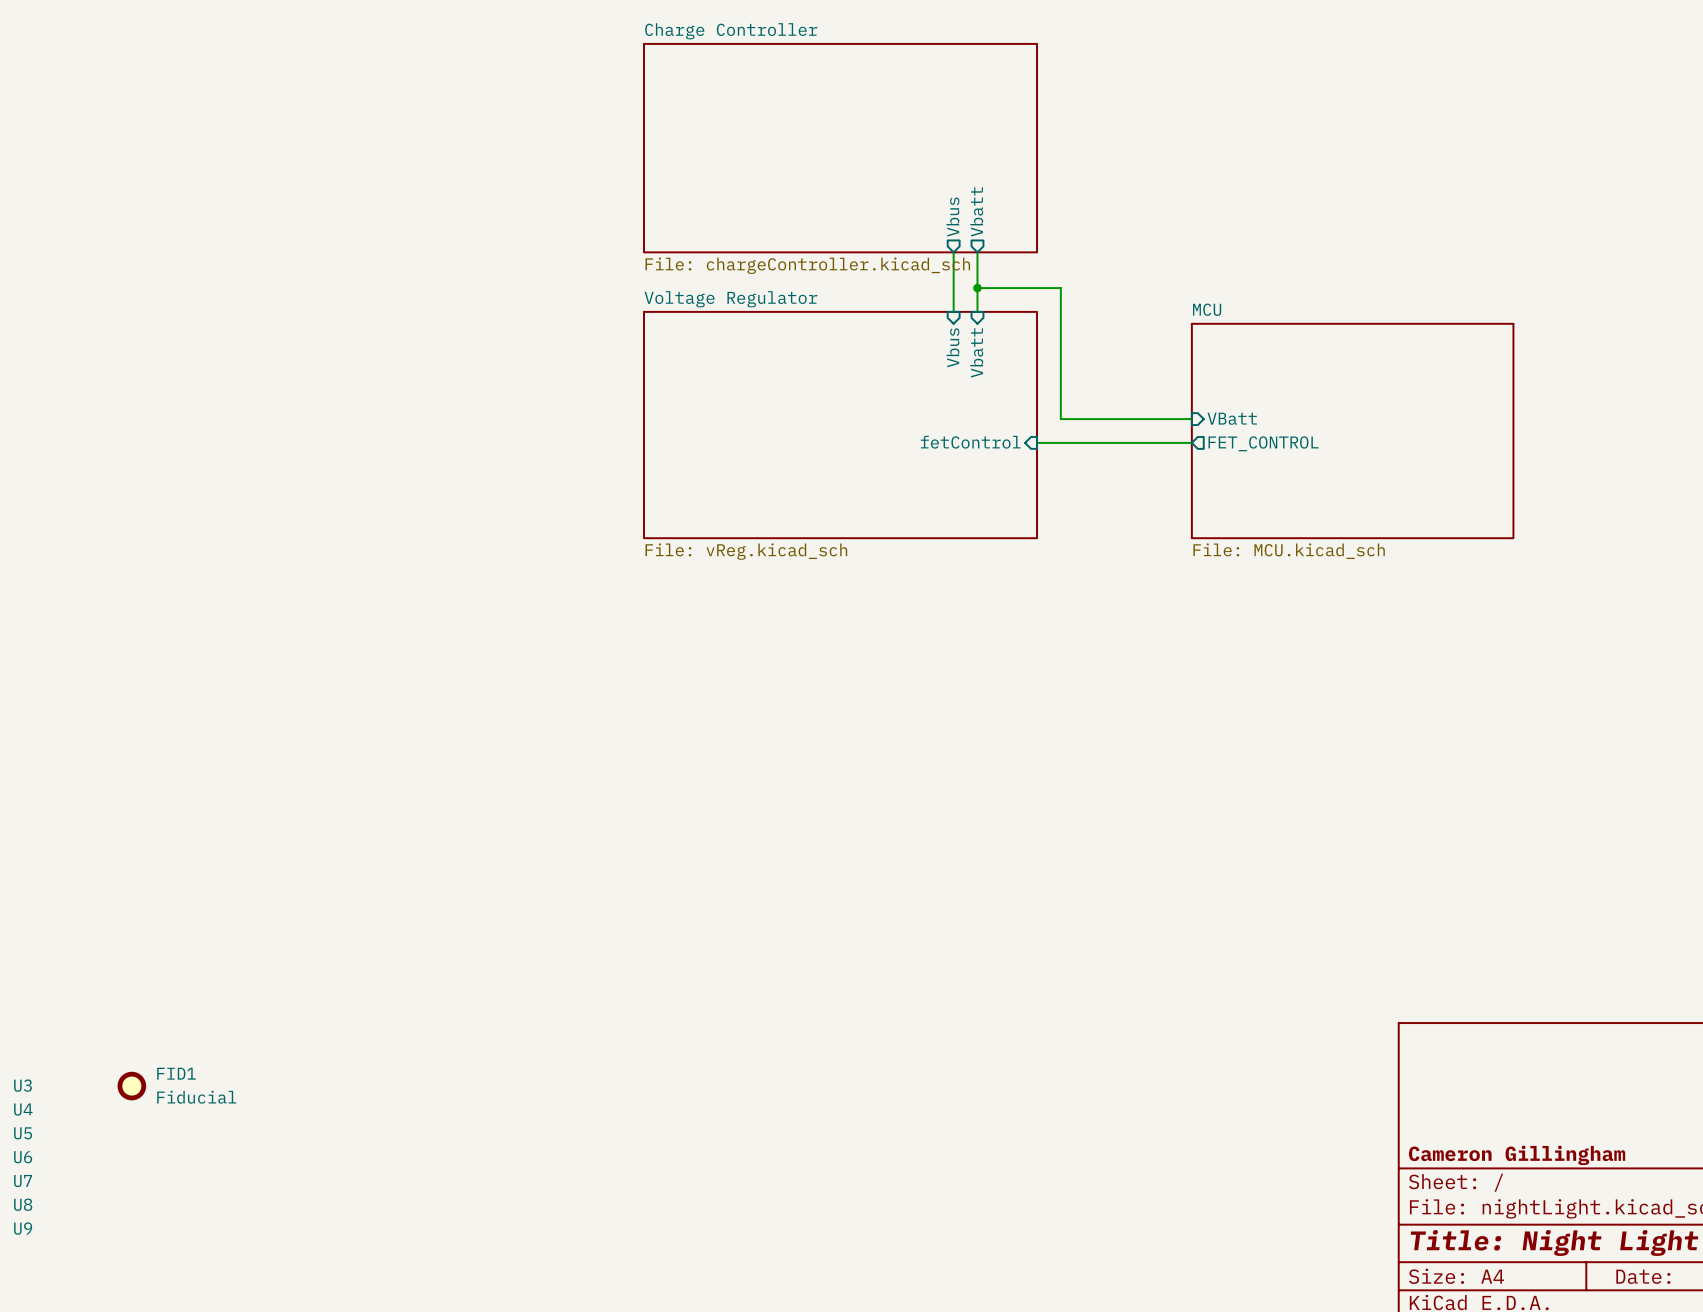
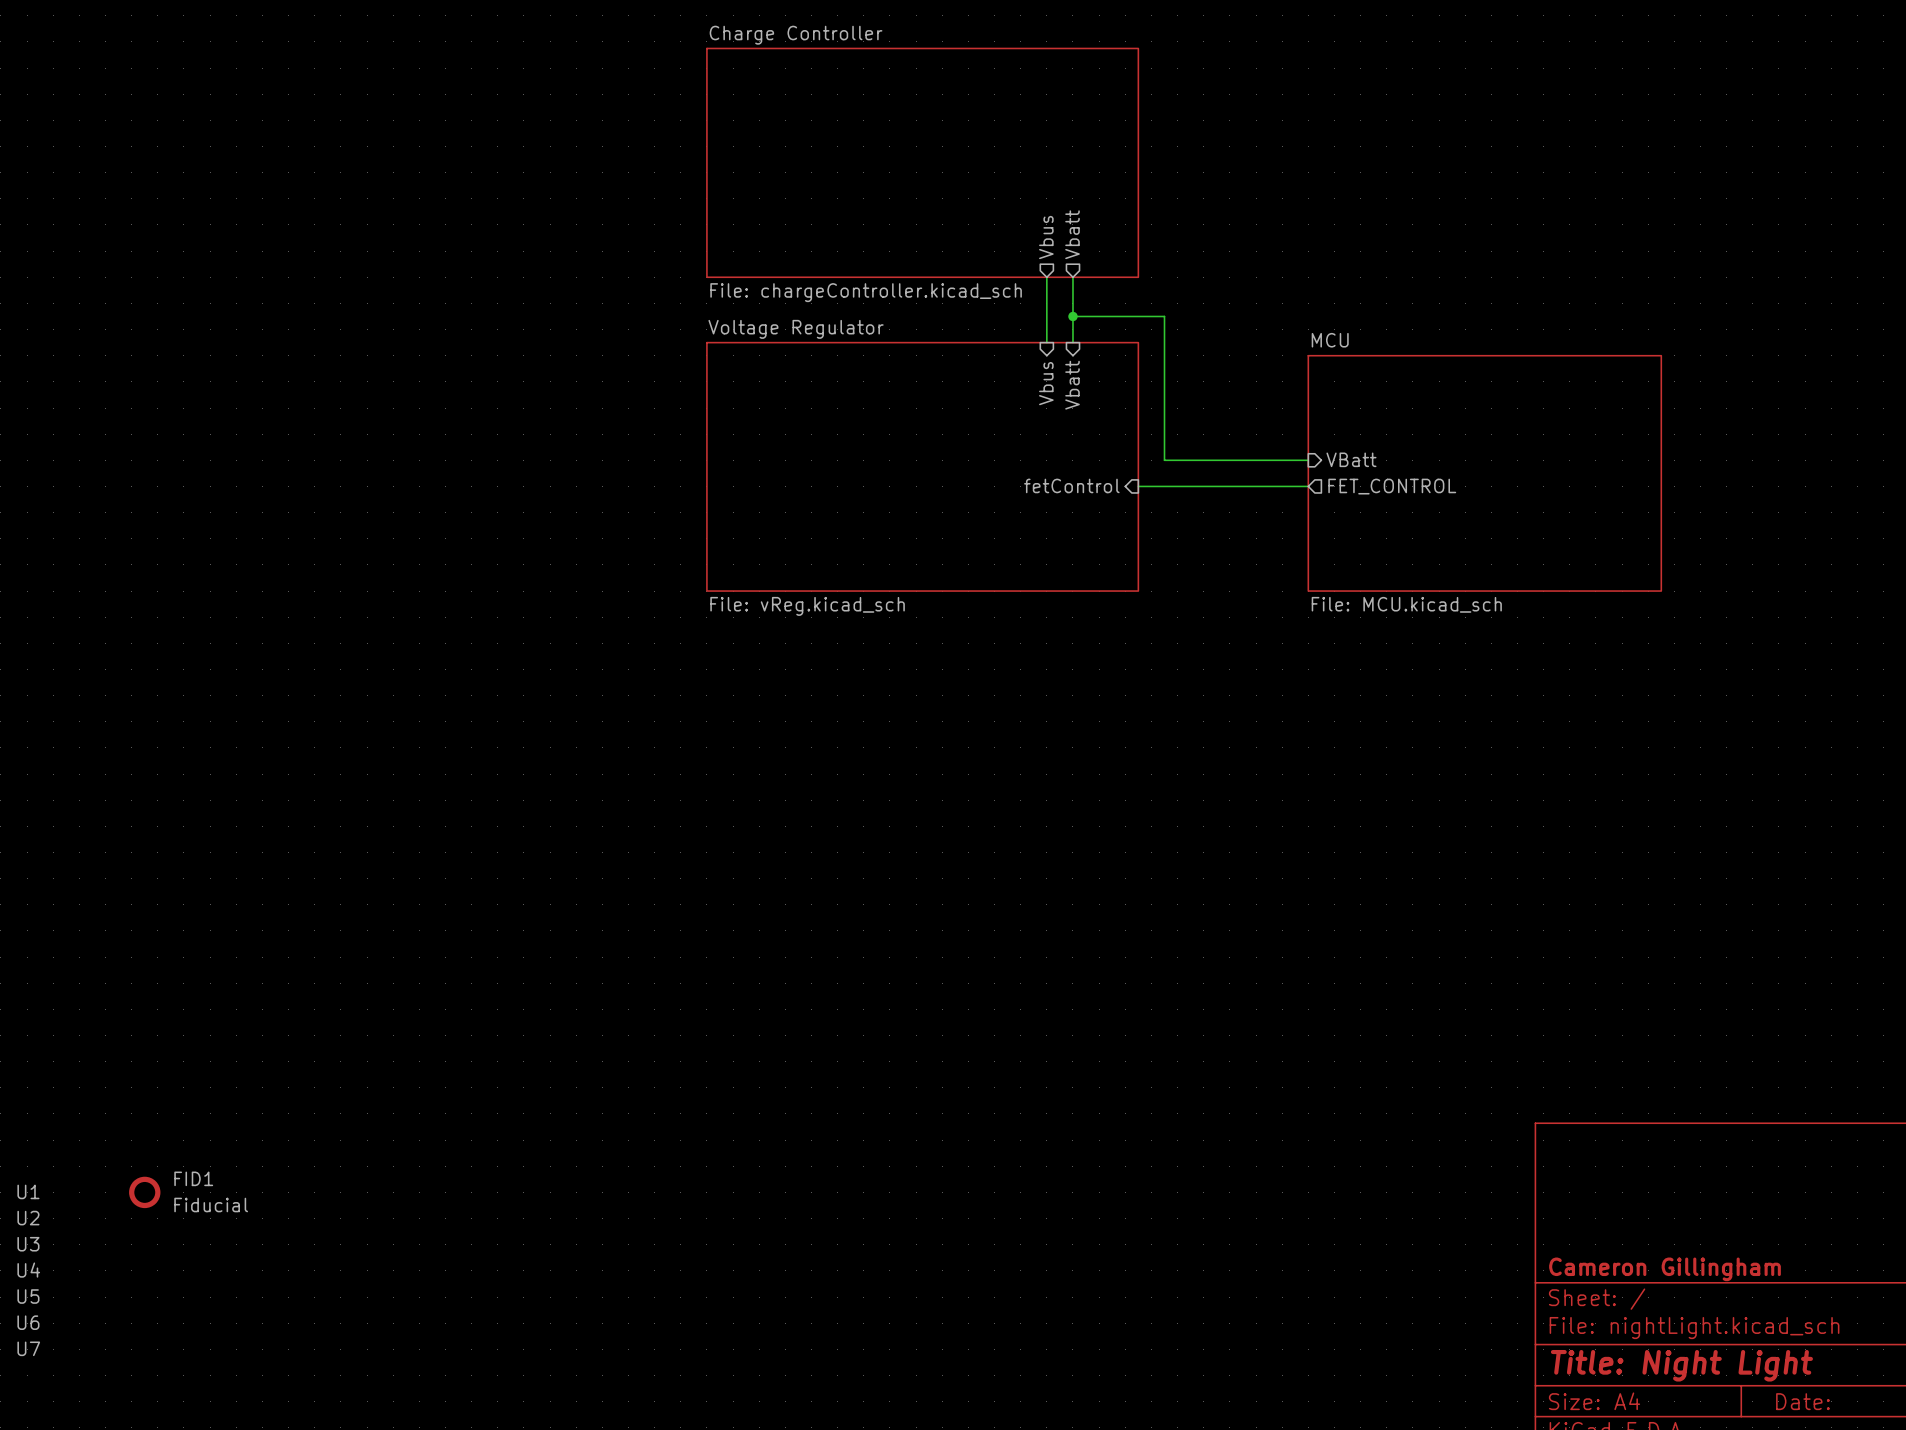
U3 name: U3 (22, 1085) -> U1 (28, 1191)
U4 name: U4 (23, 1109) -> U2 (28, 1218)
U5 name: U5 (23, 1133) -> U3 (28, 1244)
U6 name: U6 (23, 1157) -> U4 (28, 1270)
U7 name: U7 (23, 1181) -> U5 (28, 1296)
U8 name: U8 (23, 1204) -> U6 (28, 1322)
U9 name: U9 (23, 1228) -> U7 (28, 1348)

